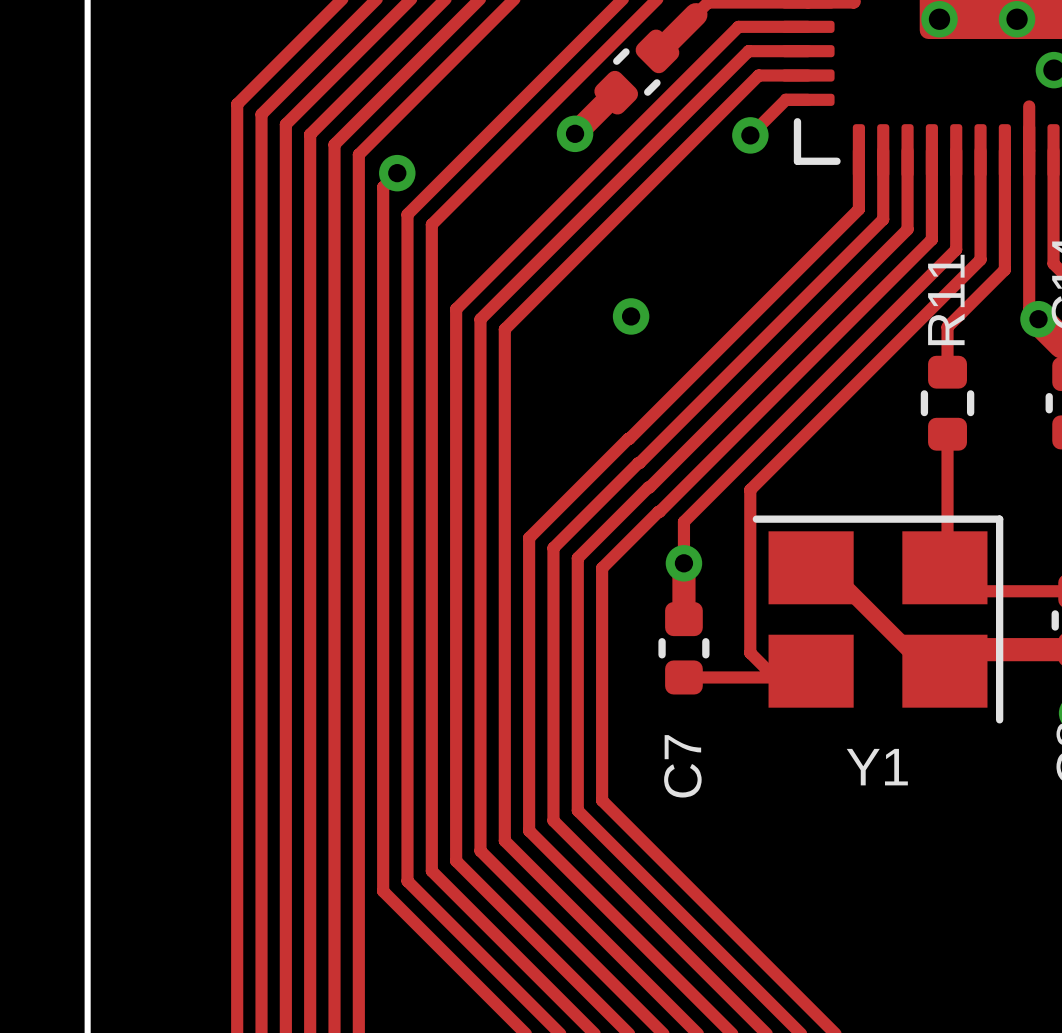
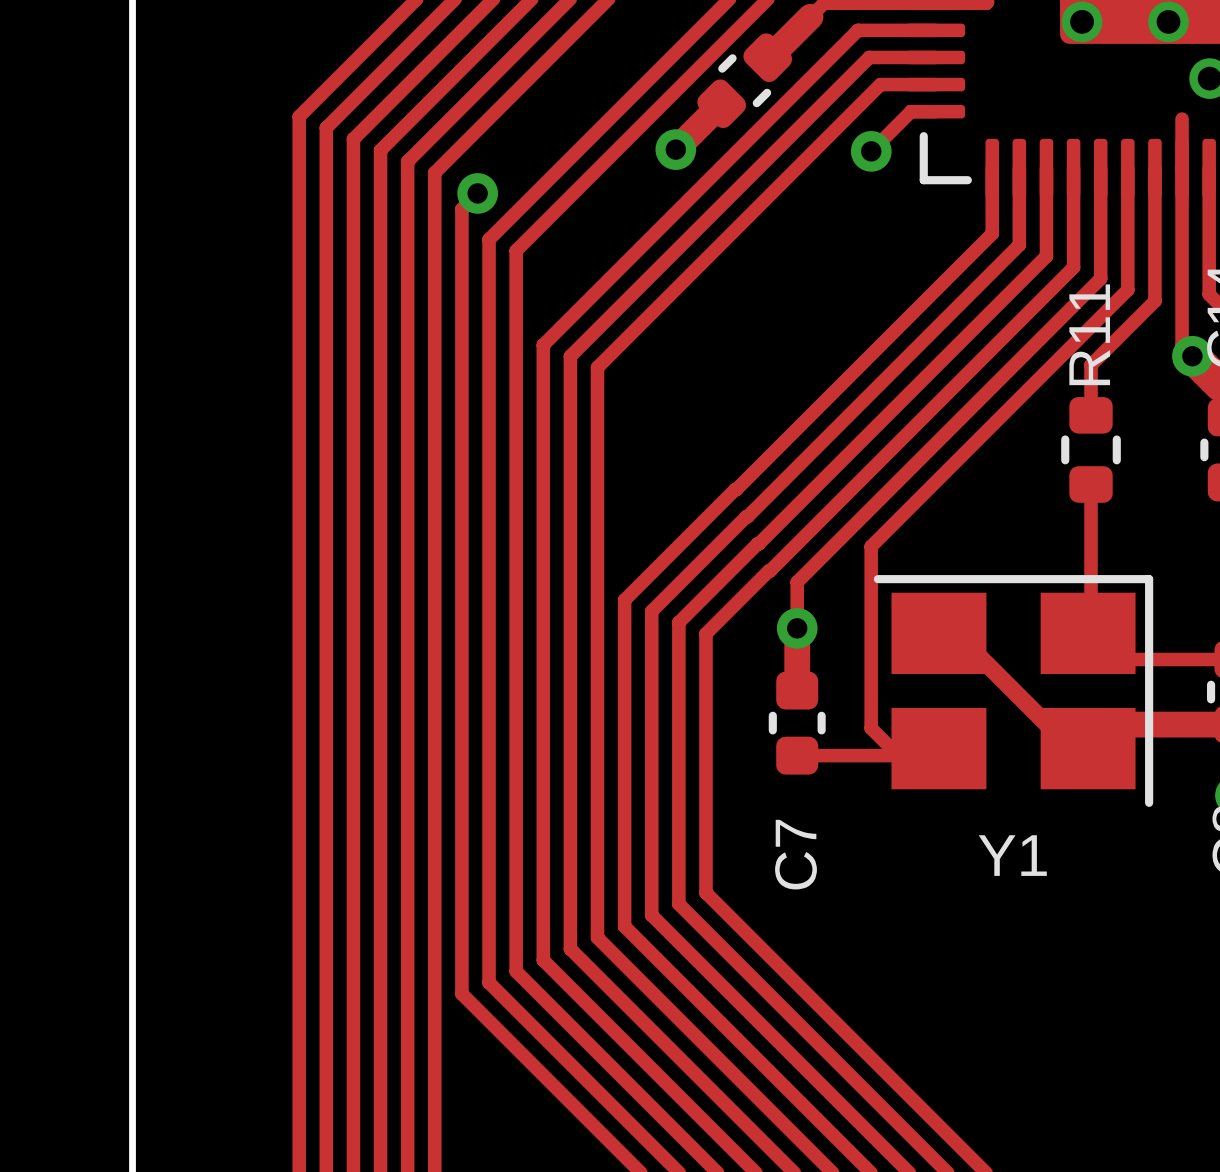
via: (631, 316) -> none

